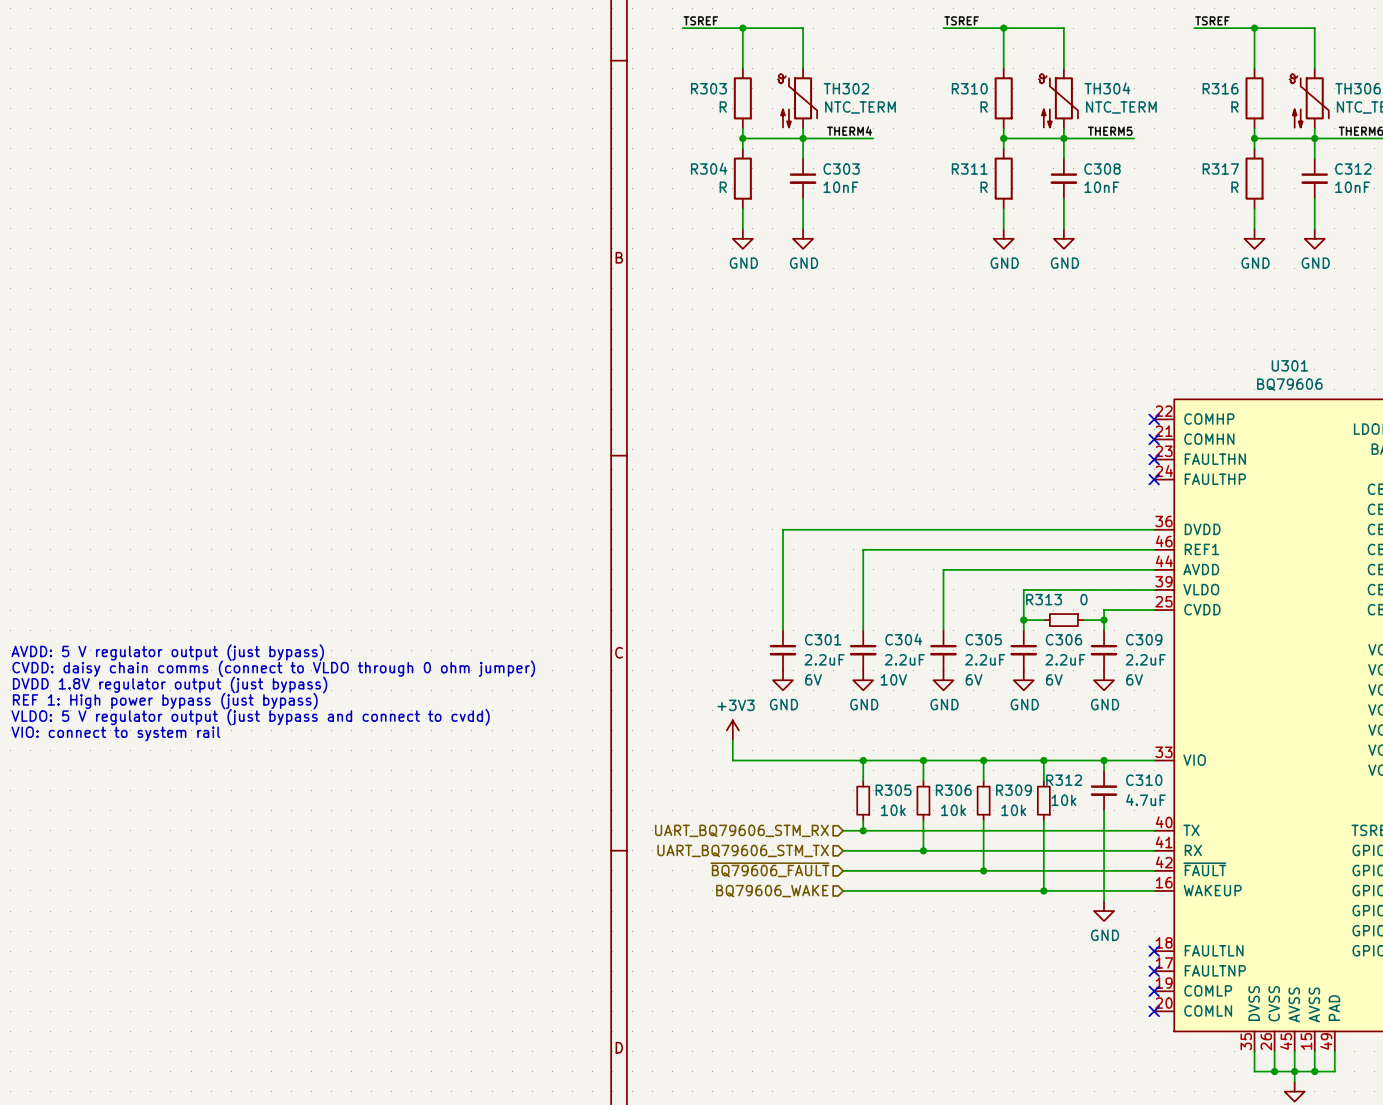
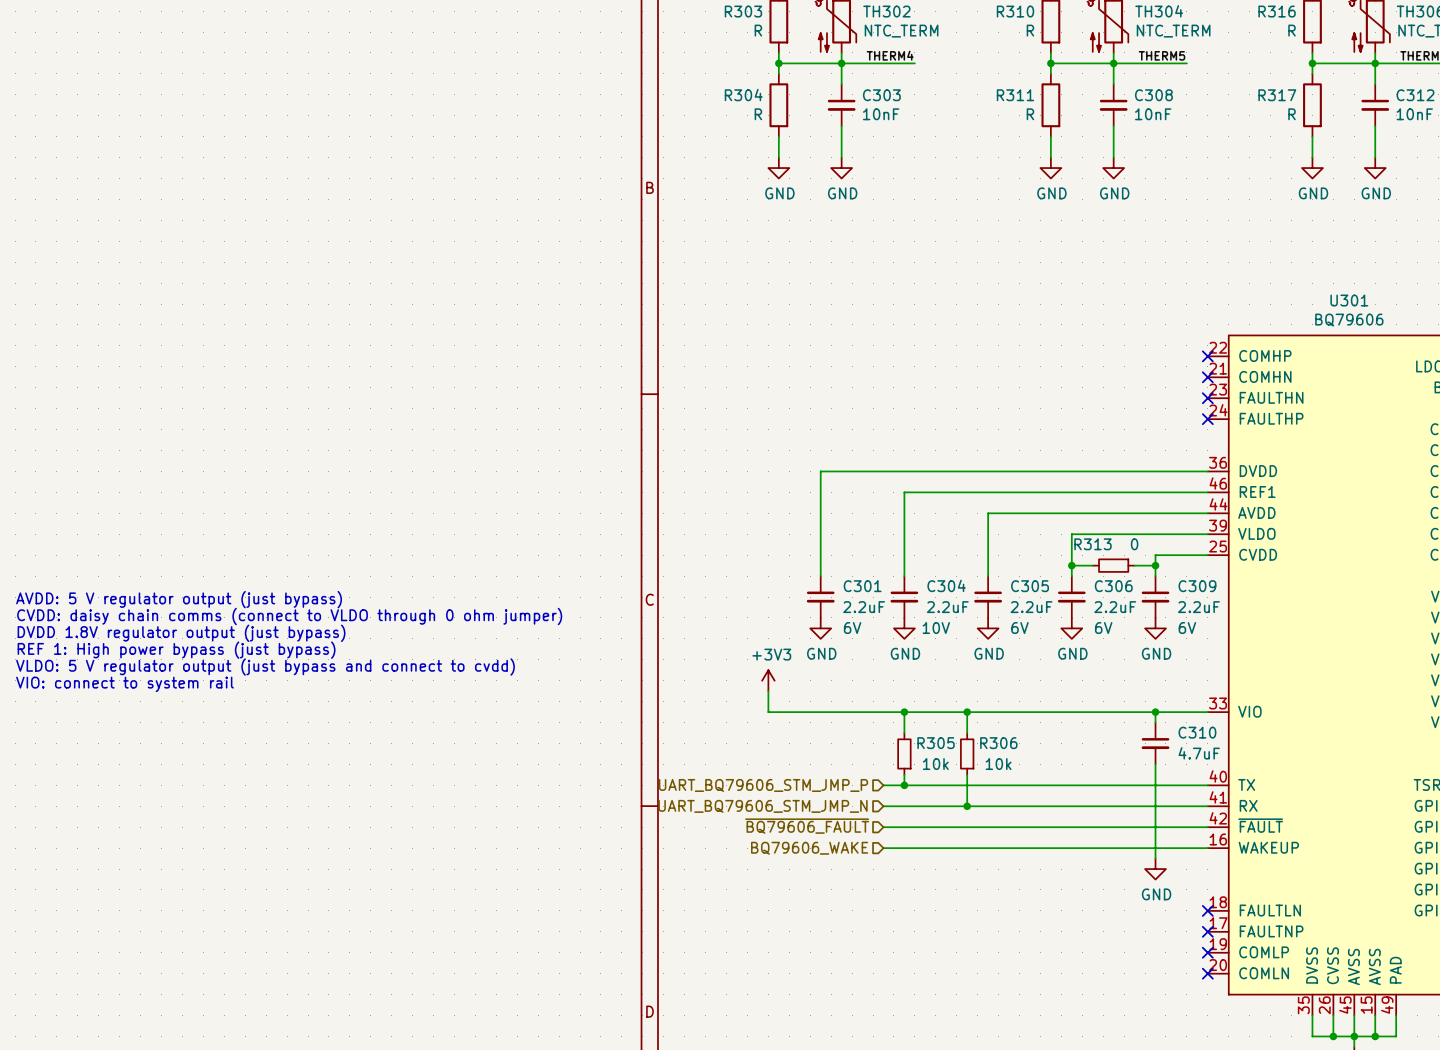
wire: (983, 760) (983, 780) -> none
junction: (983, 760) -> none
wire: (1043, 760) (1043, 780) -> none
junction: (1043, 760) -> none
R309: 10k (983, 800) -> none
R312: 10k (1043, 800) -> none
wire: (983, 820) (983, 870) -> none
wire: (1043, 820) (1043, 890) -> none
hierarchical label: UART_BQ79606_STM_RX (741, 830) -> UART_BQ79606_STM_JMP_P (763, 785)
hierarchical label: UART_BQ79606_STM_TX (743, 850) -> UART_BQ79606_STM_JMP_N (762, 806)
junction: (983, 870) -> none
junction: (1043, 890) -> none

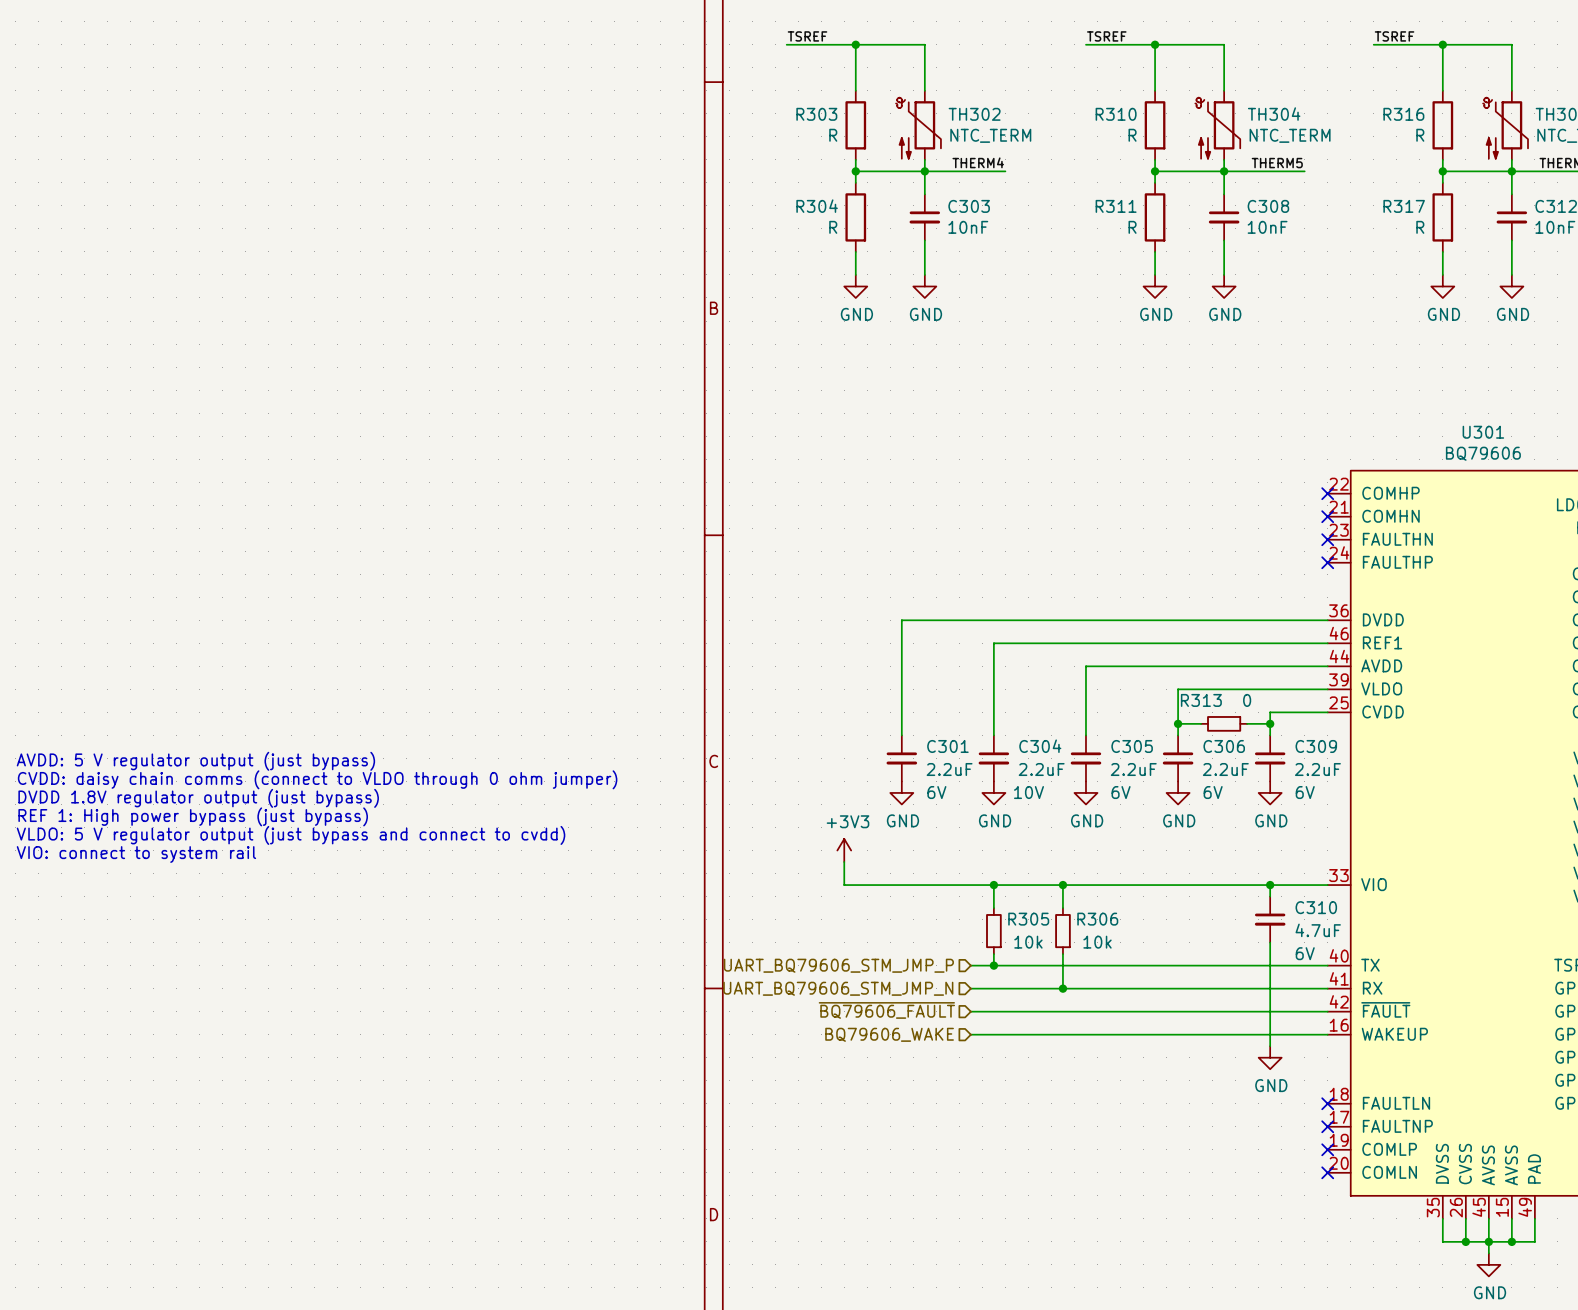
C310 text: none -> 6V (1305, 953)

